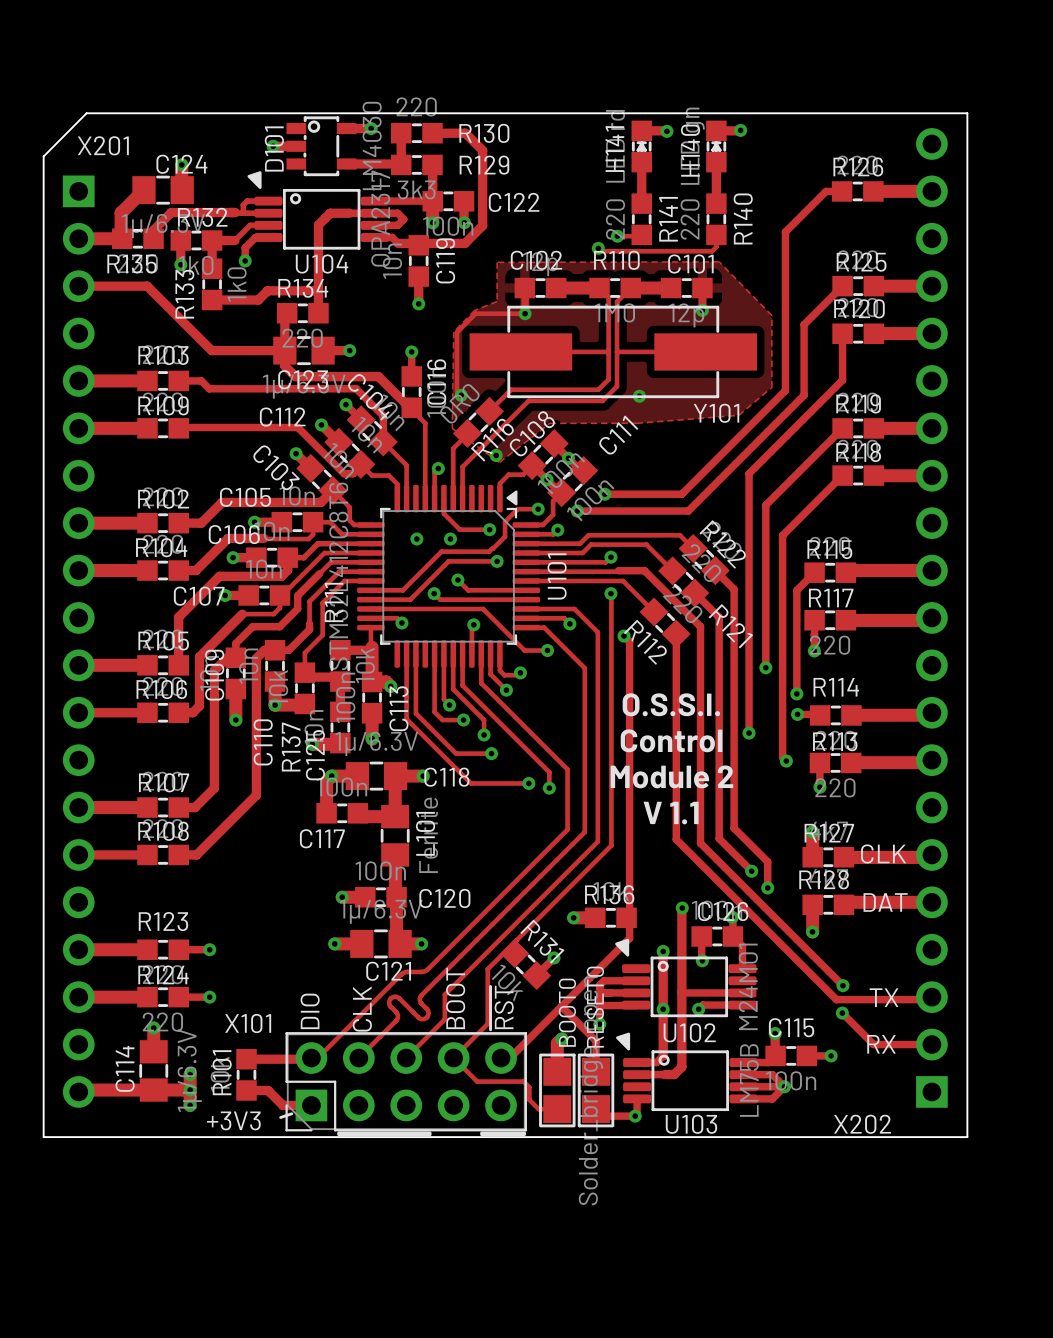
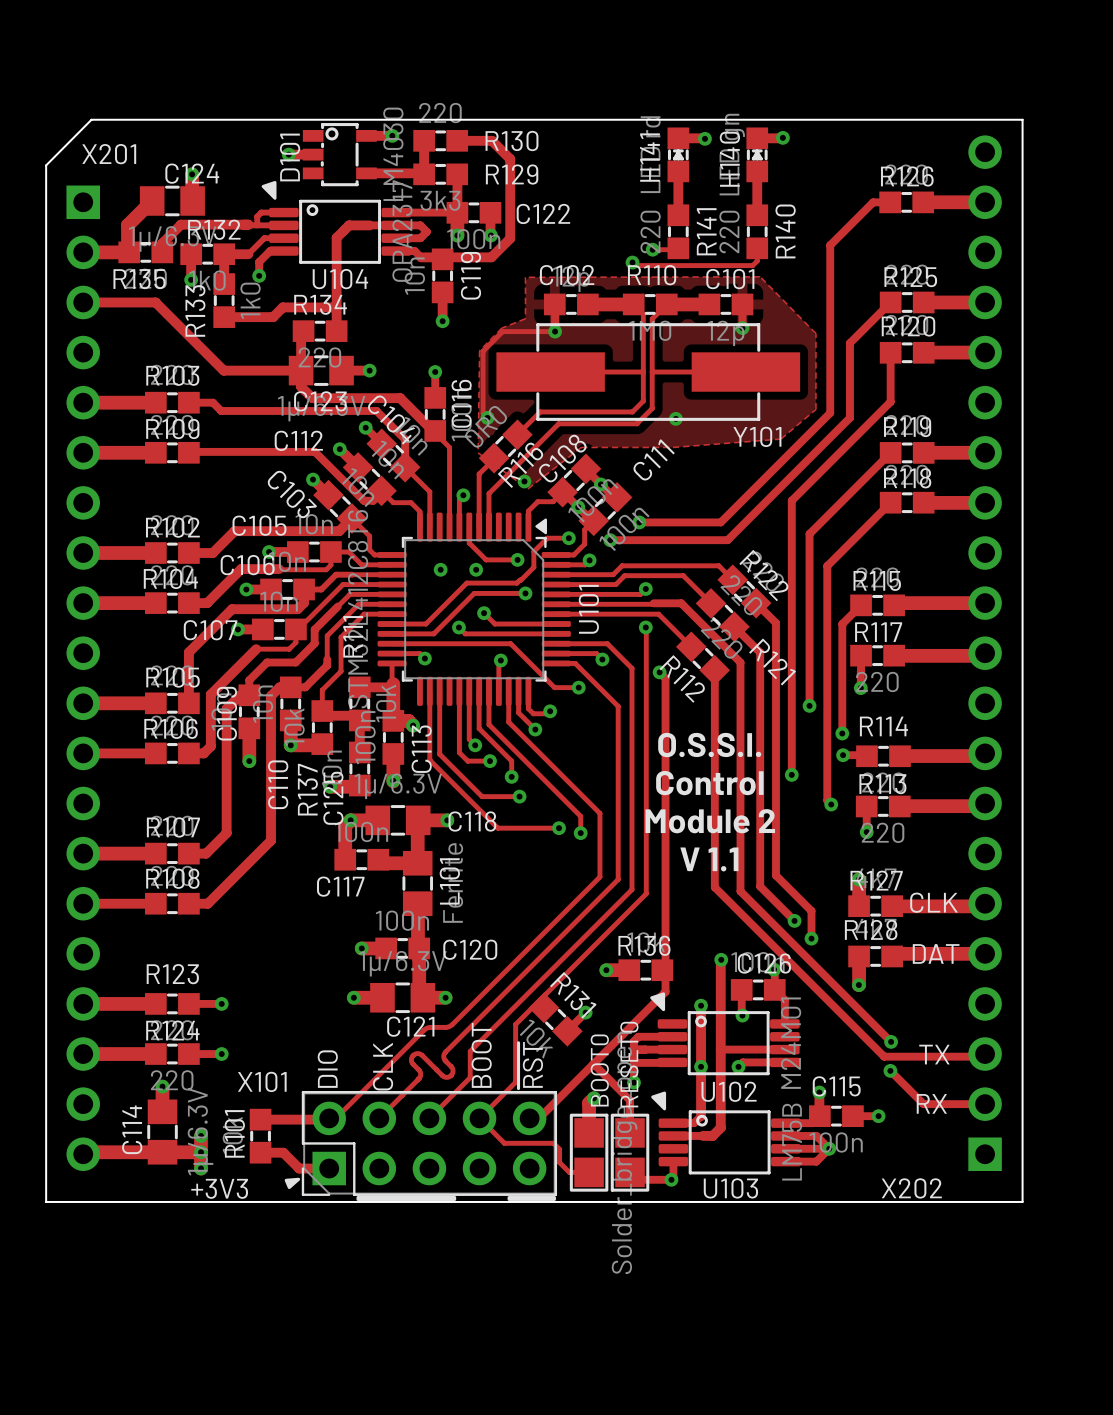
line: (291, 1113) (280, 1117) -> none
drawing: none -> [284, 1177, 301, 1190]
text position: +3V3 (233, 1120) -> +3V3 (219, 1188)

